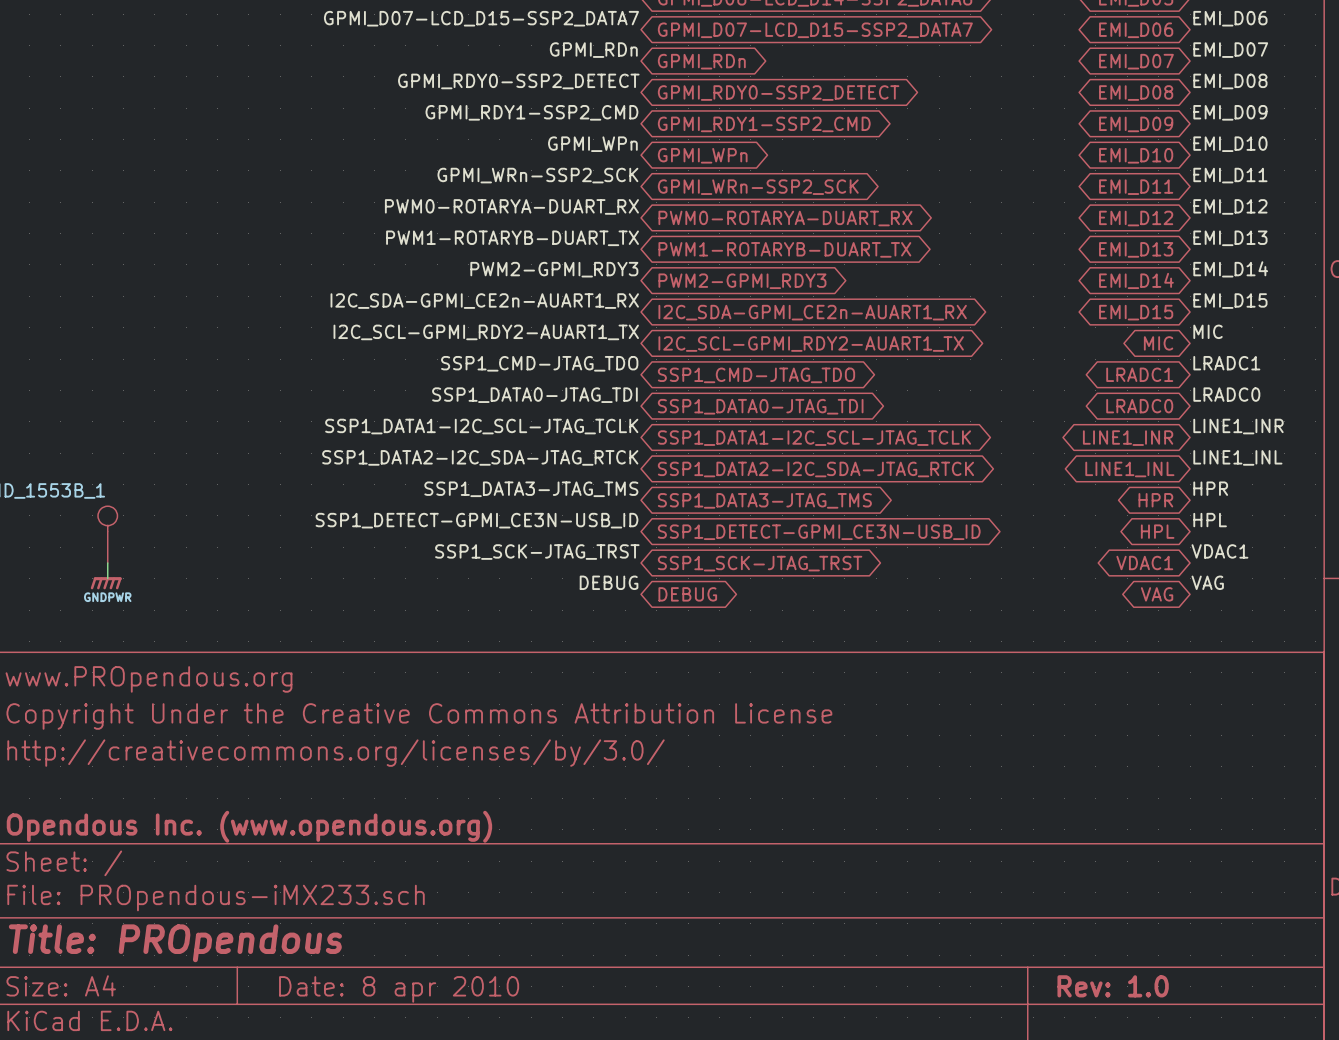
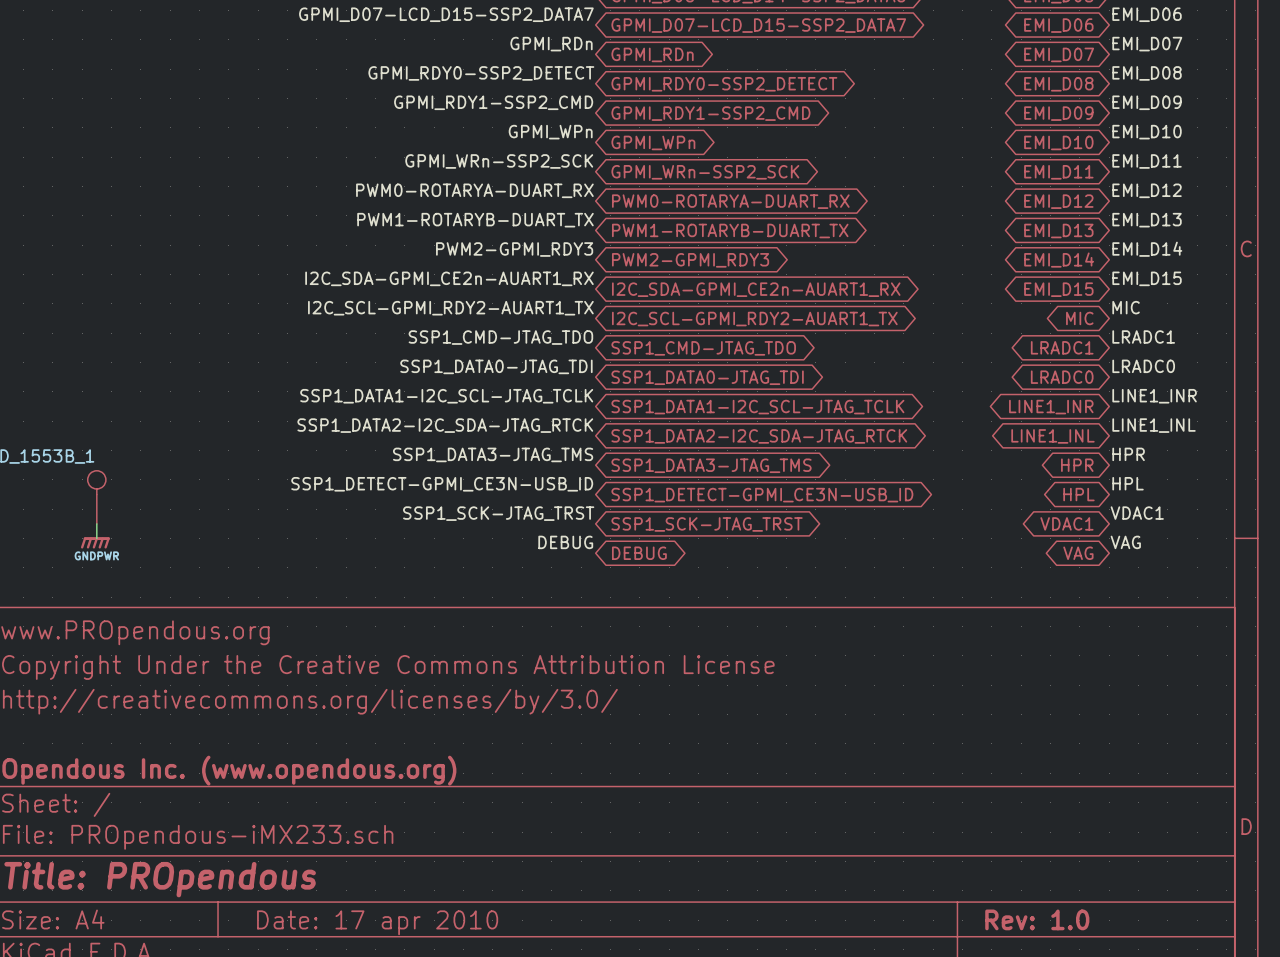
title block: Date: 8 apr 2010 (399, 989) -> Date: 17 apr 2010 (377, 922)

